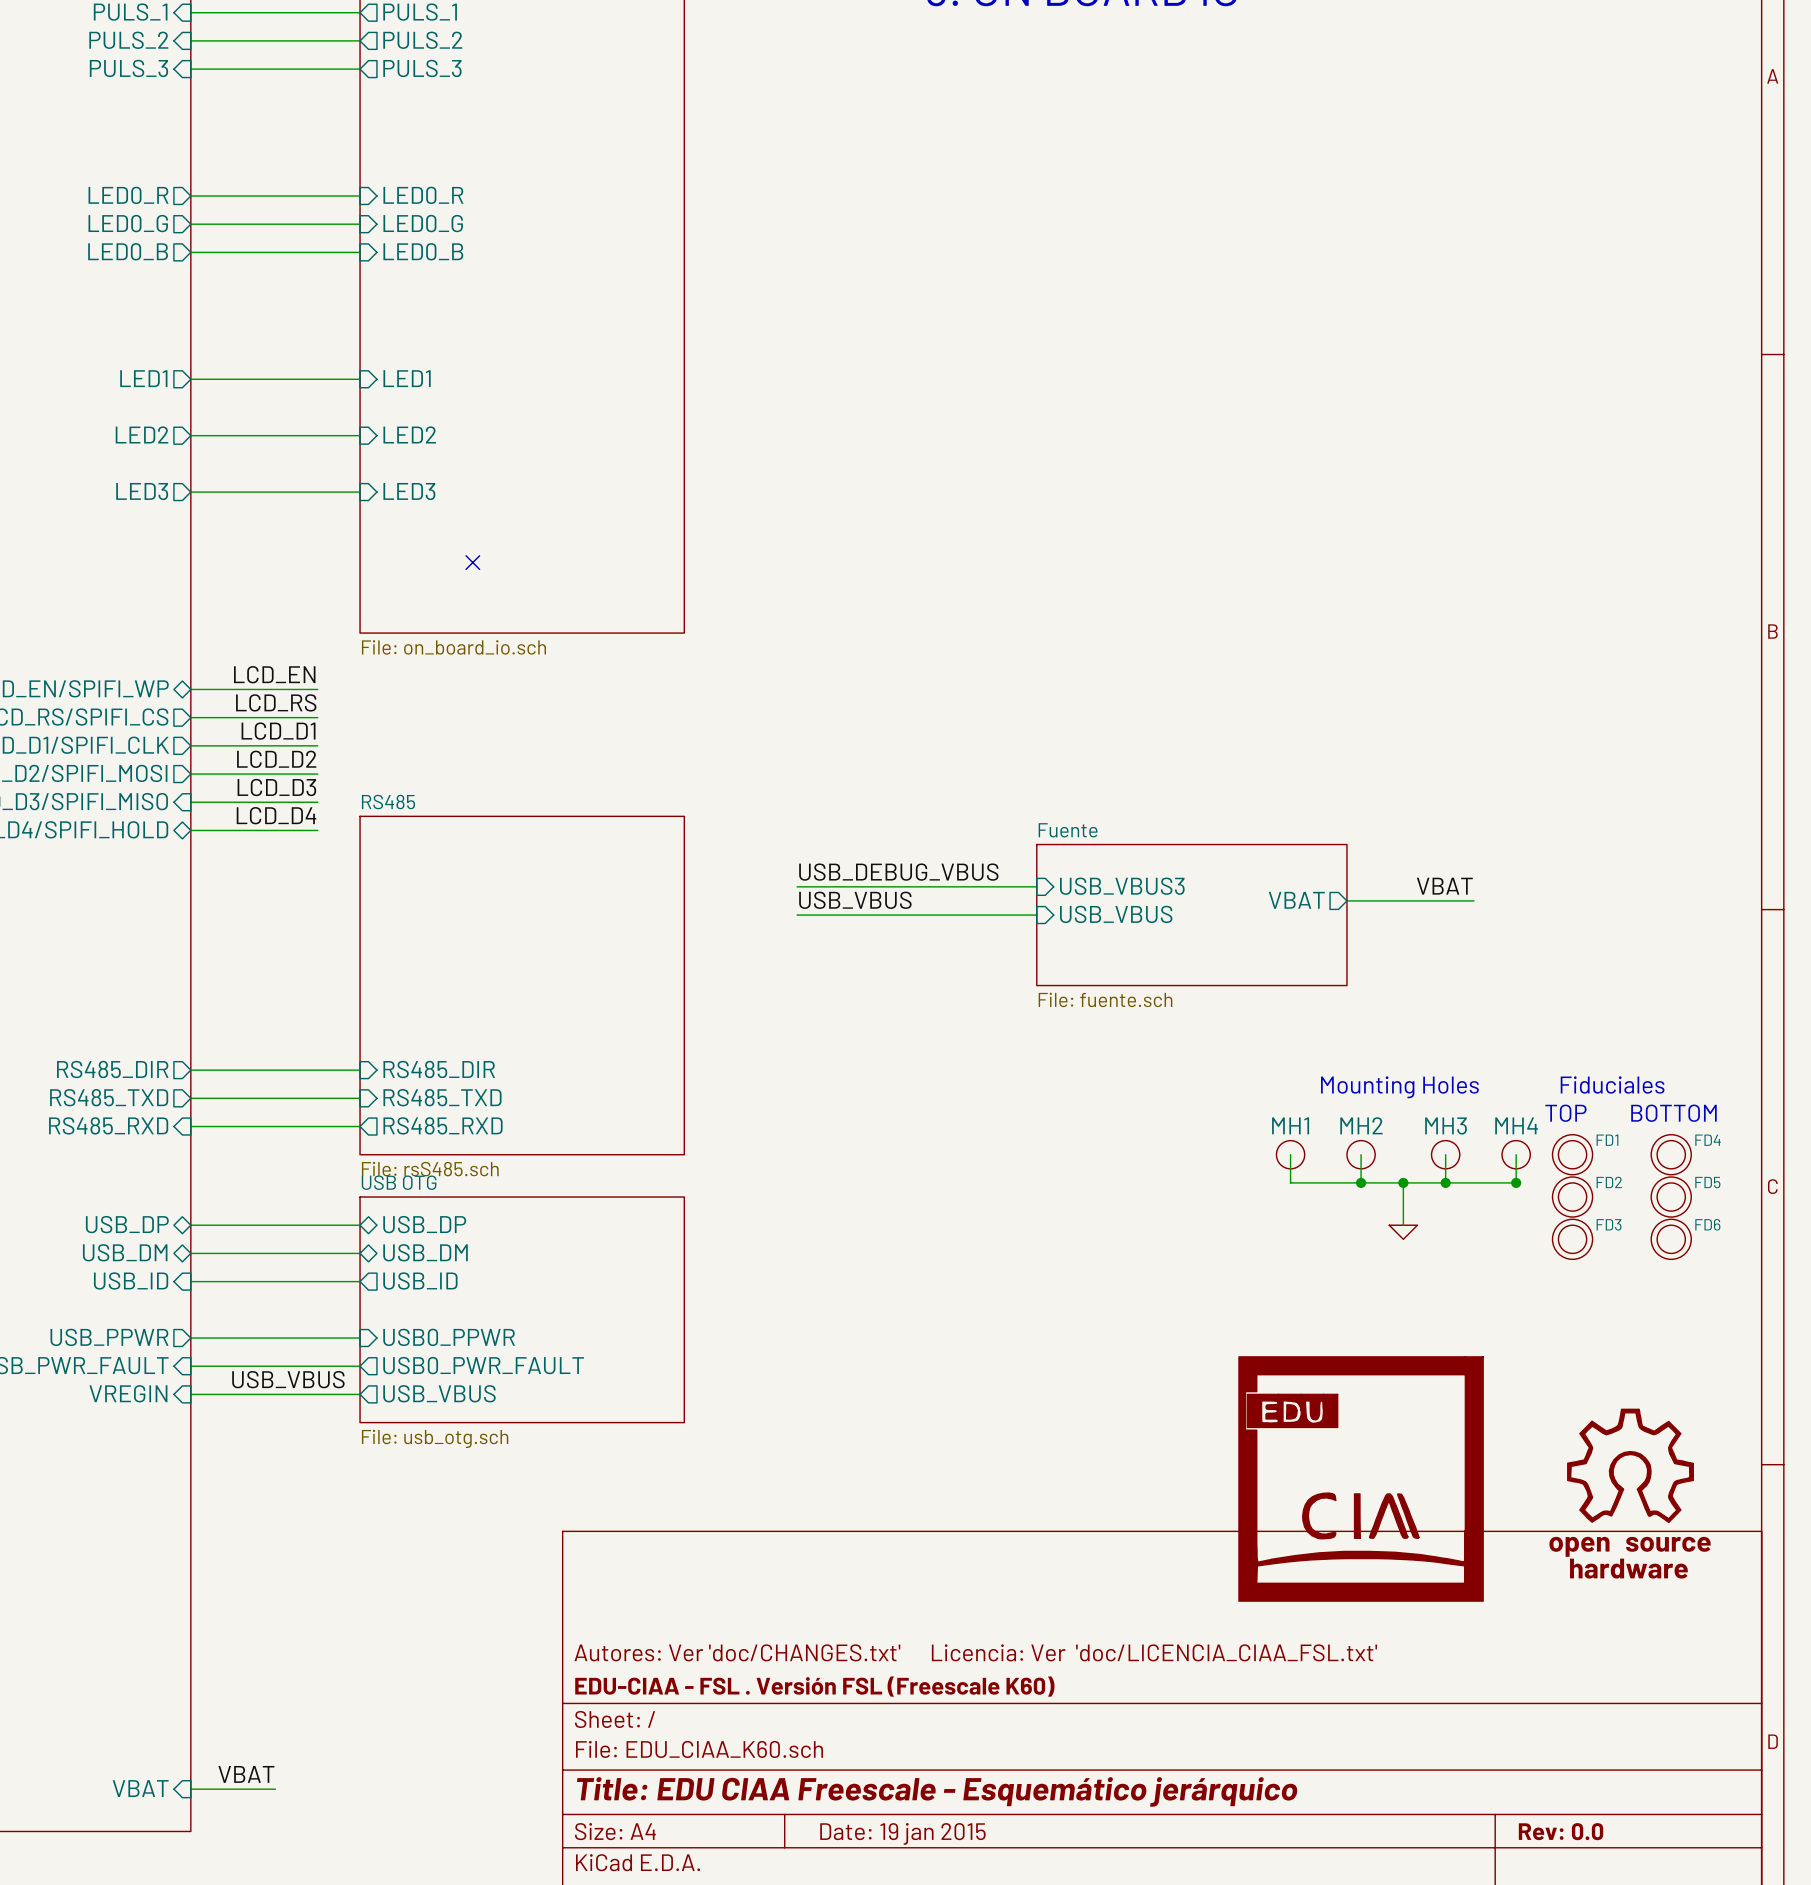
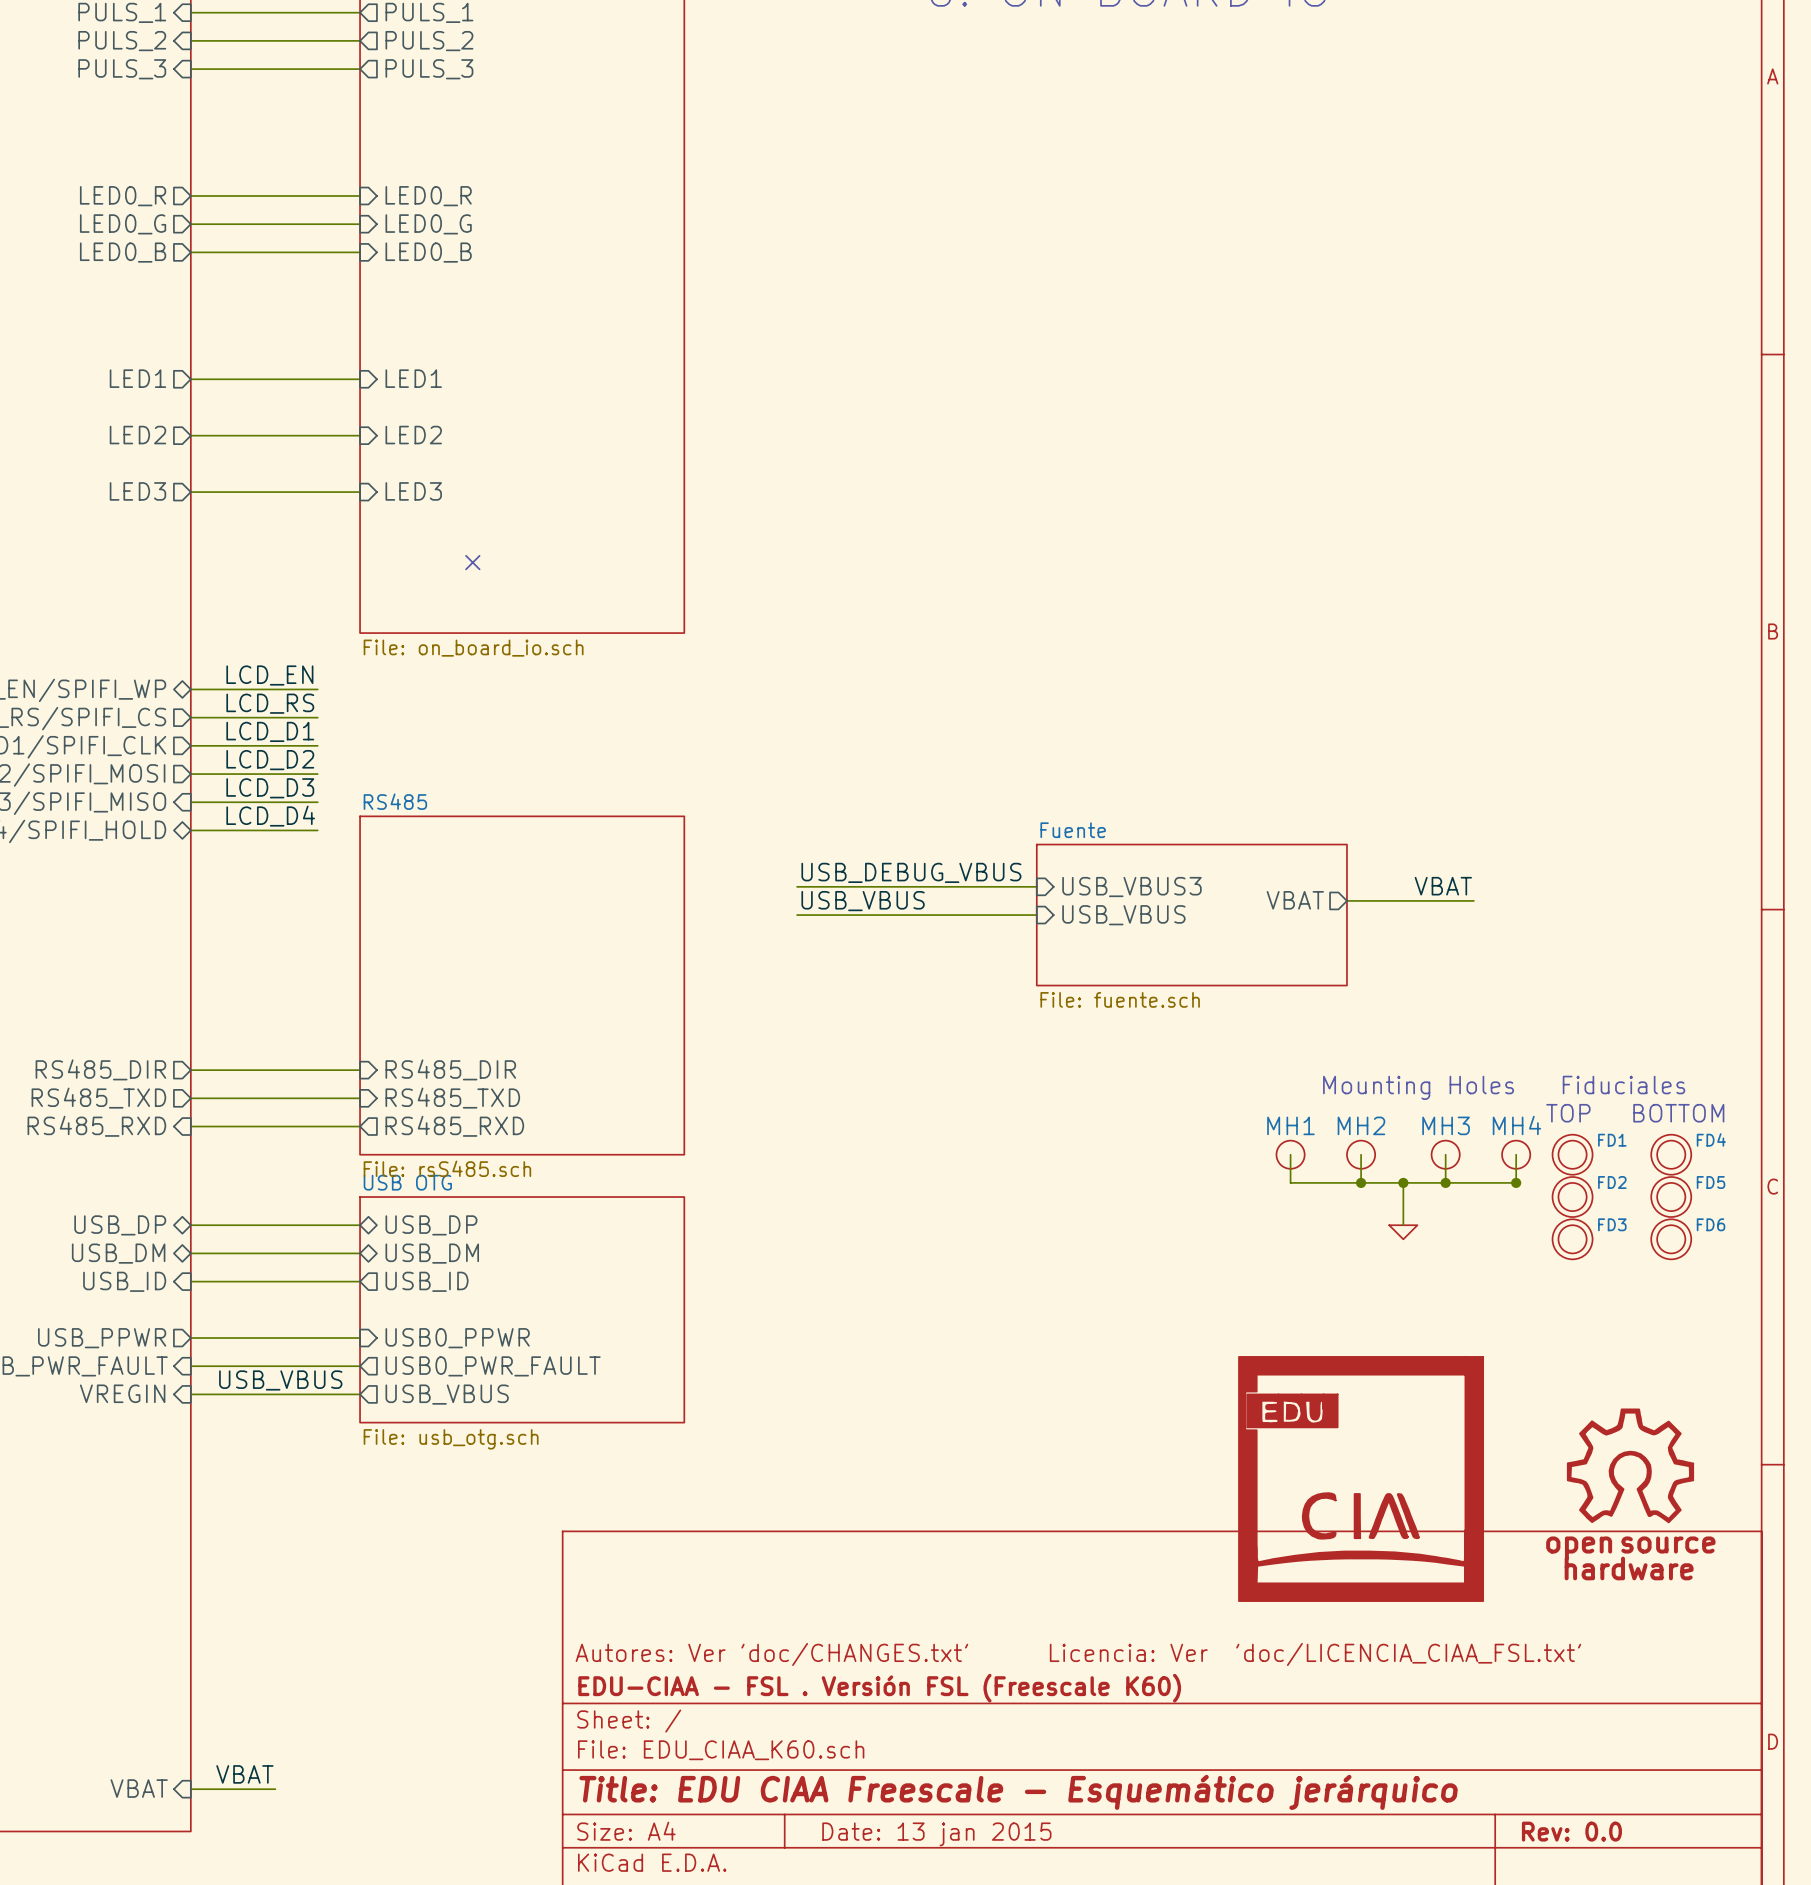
title block: Date: 19 jan 2015 (902, 1833) -> Date: 13 jan 2015 (936, 1834)

